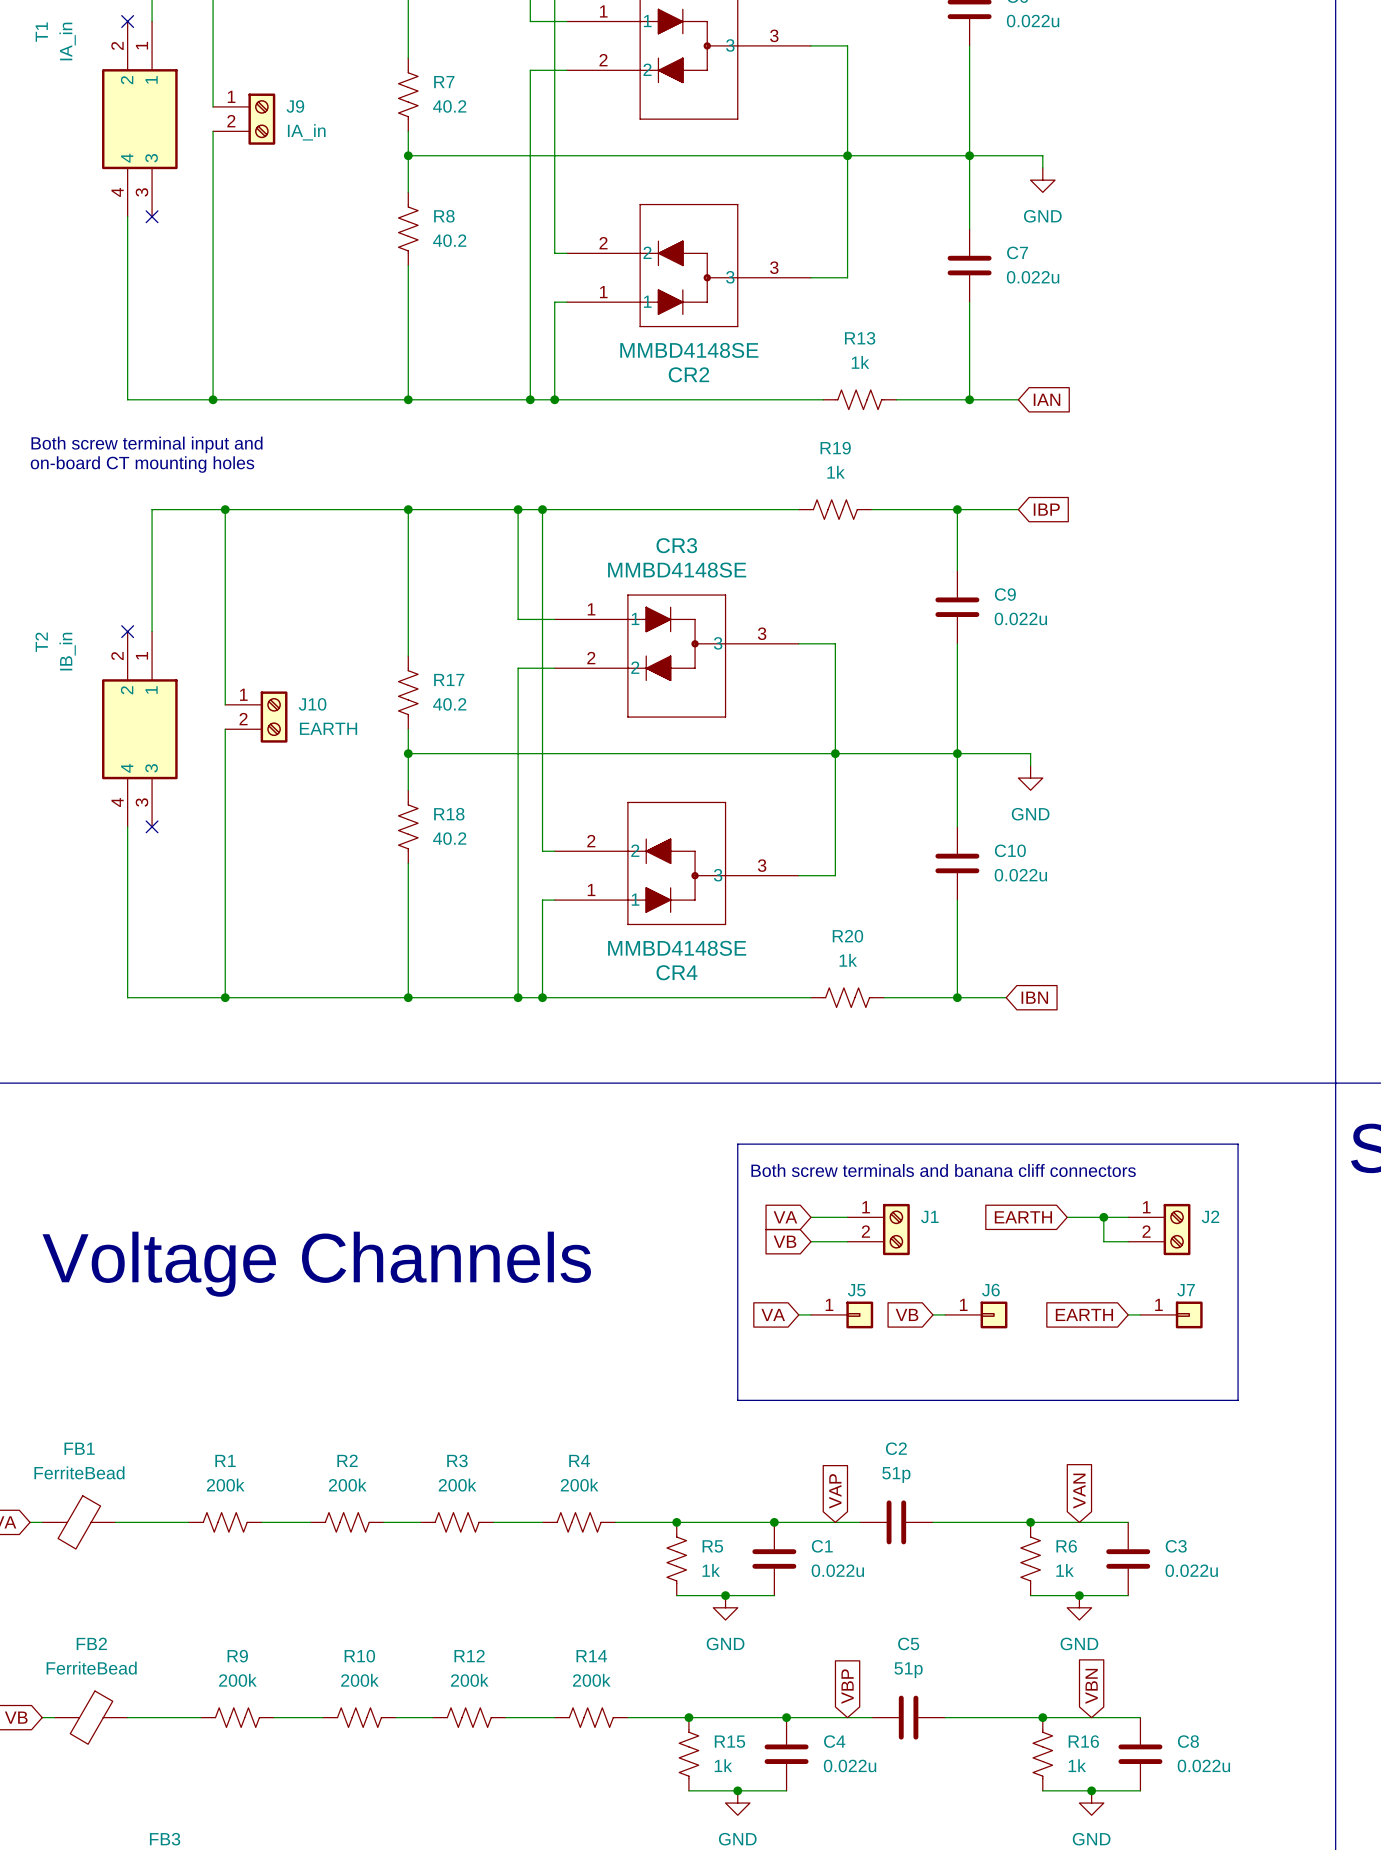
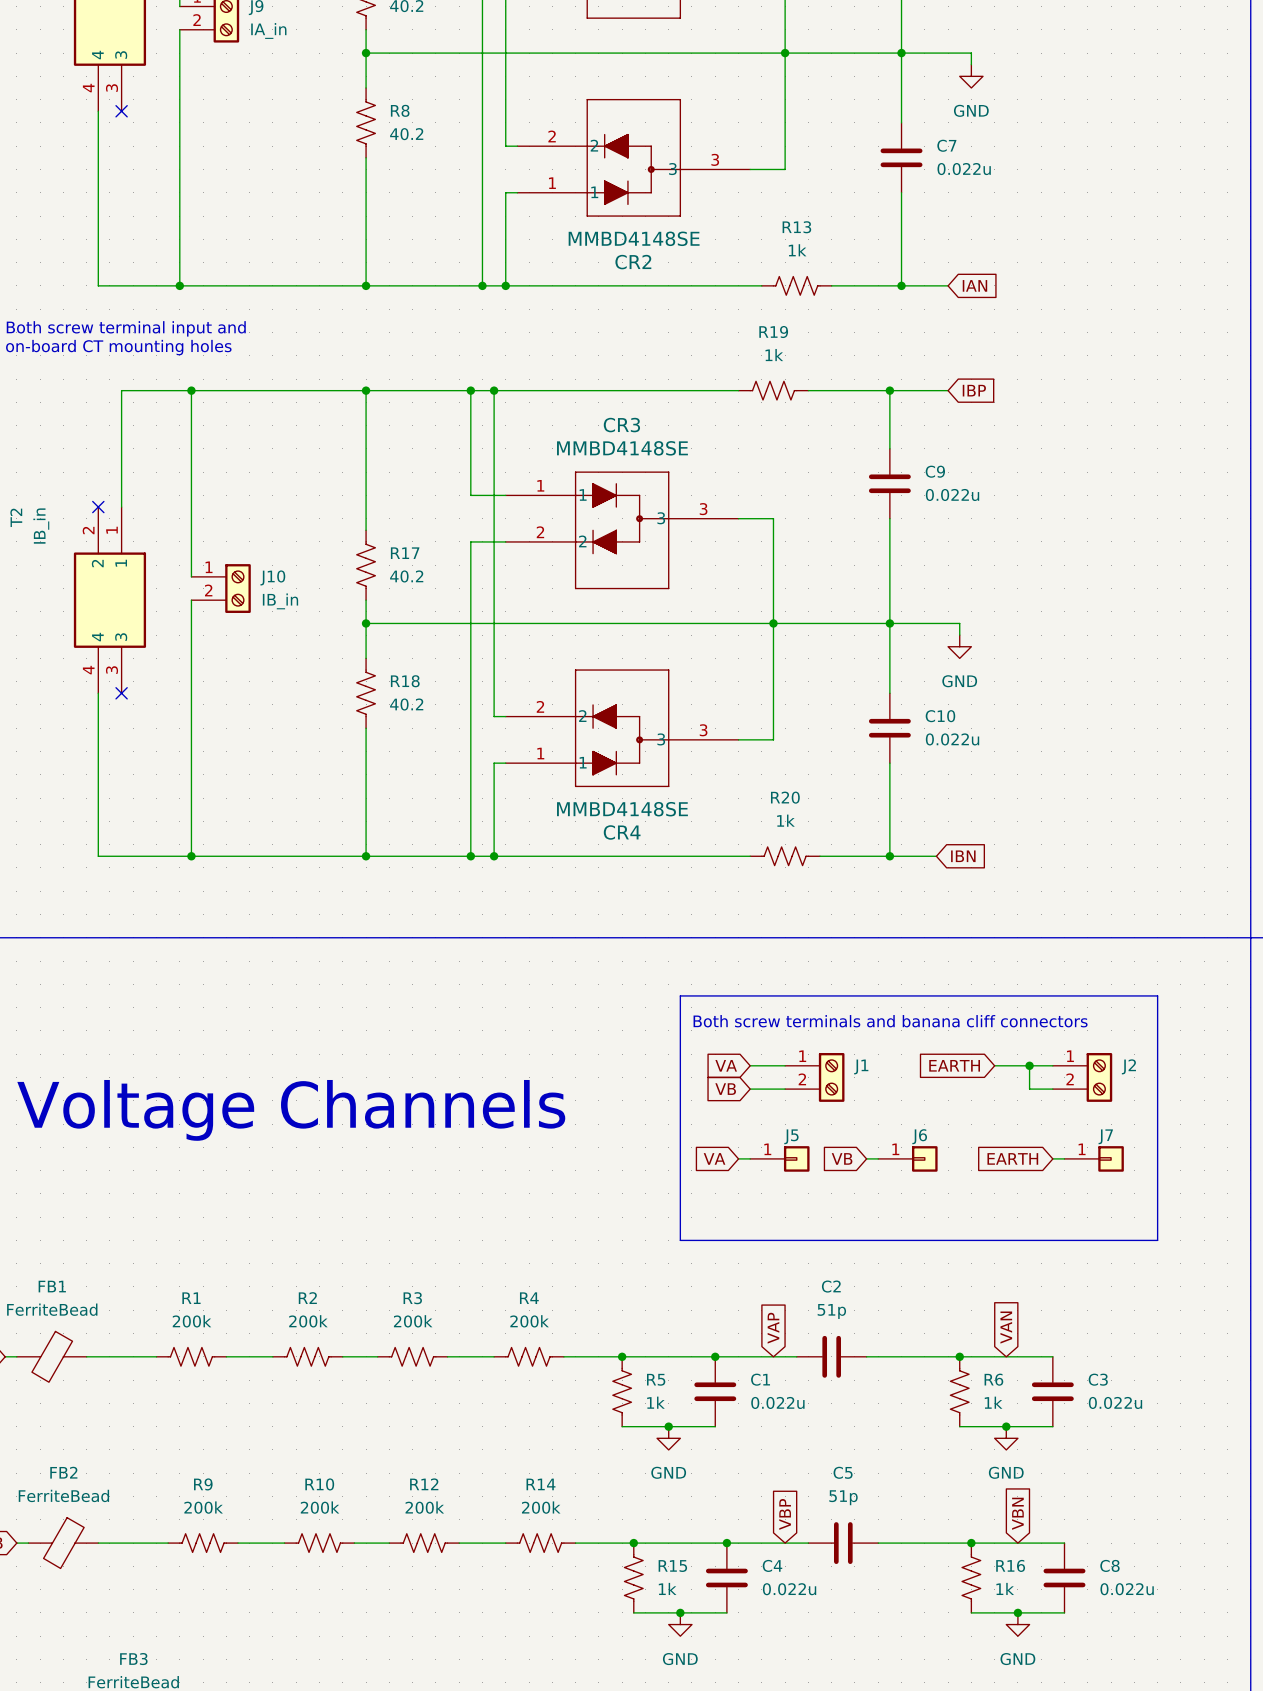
J10 value: EARTH (328, 728) -> IB_in (280, 601)

